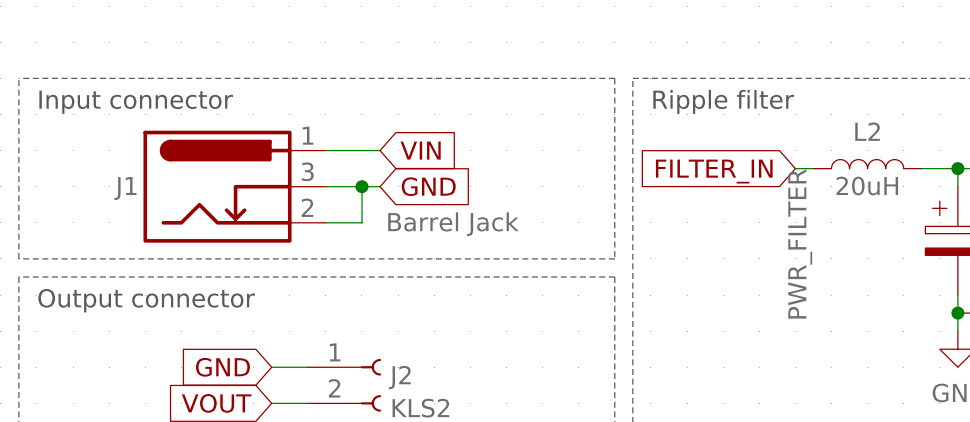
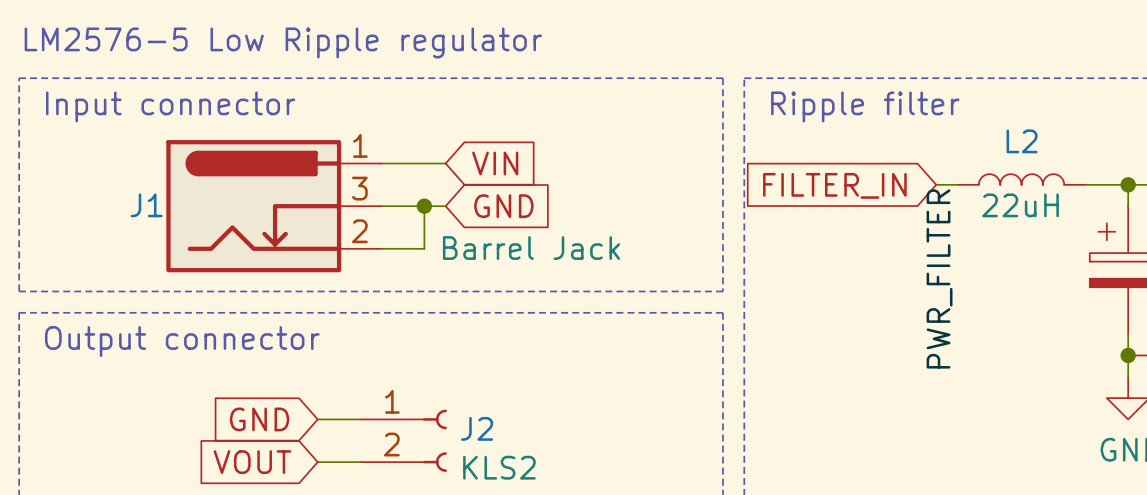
text: none -> LM2576-5 Low Ripple regulator (283, 42)
L2 value: 20uH (867, 186) -> 22uH (1020, 205)

